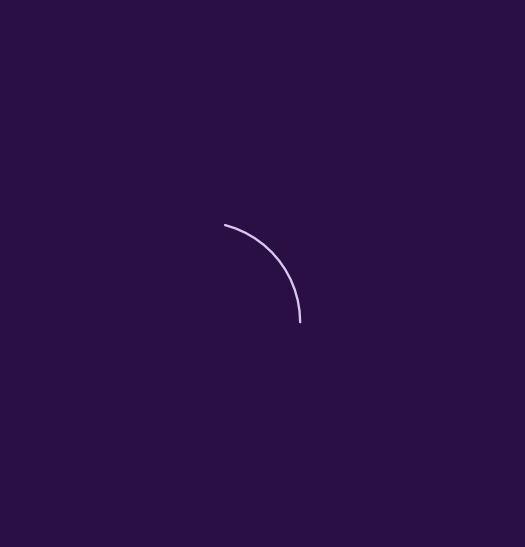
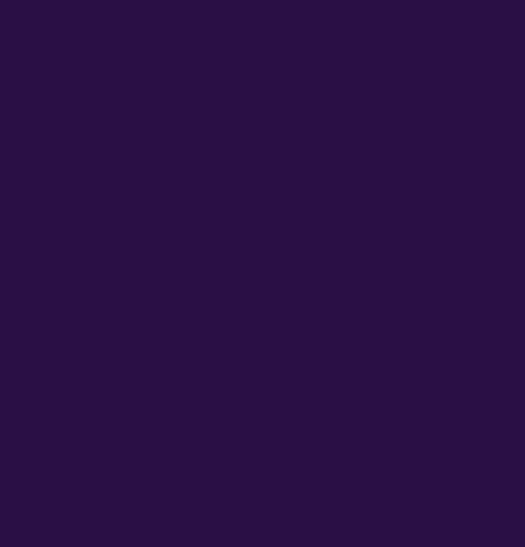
board edge: (225, 225) (255, 238) (279, 260) (294, 289) (300, 322) -> none

